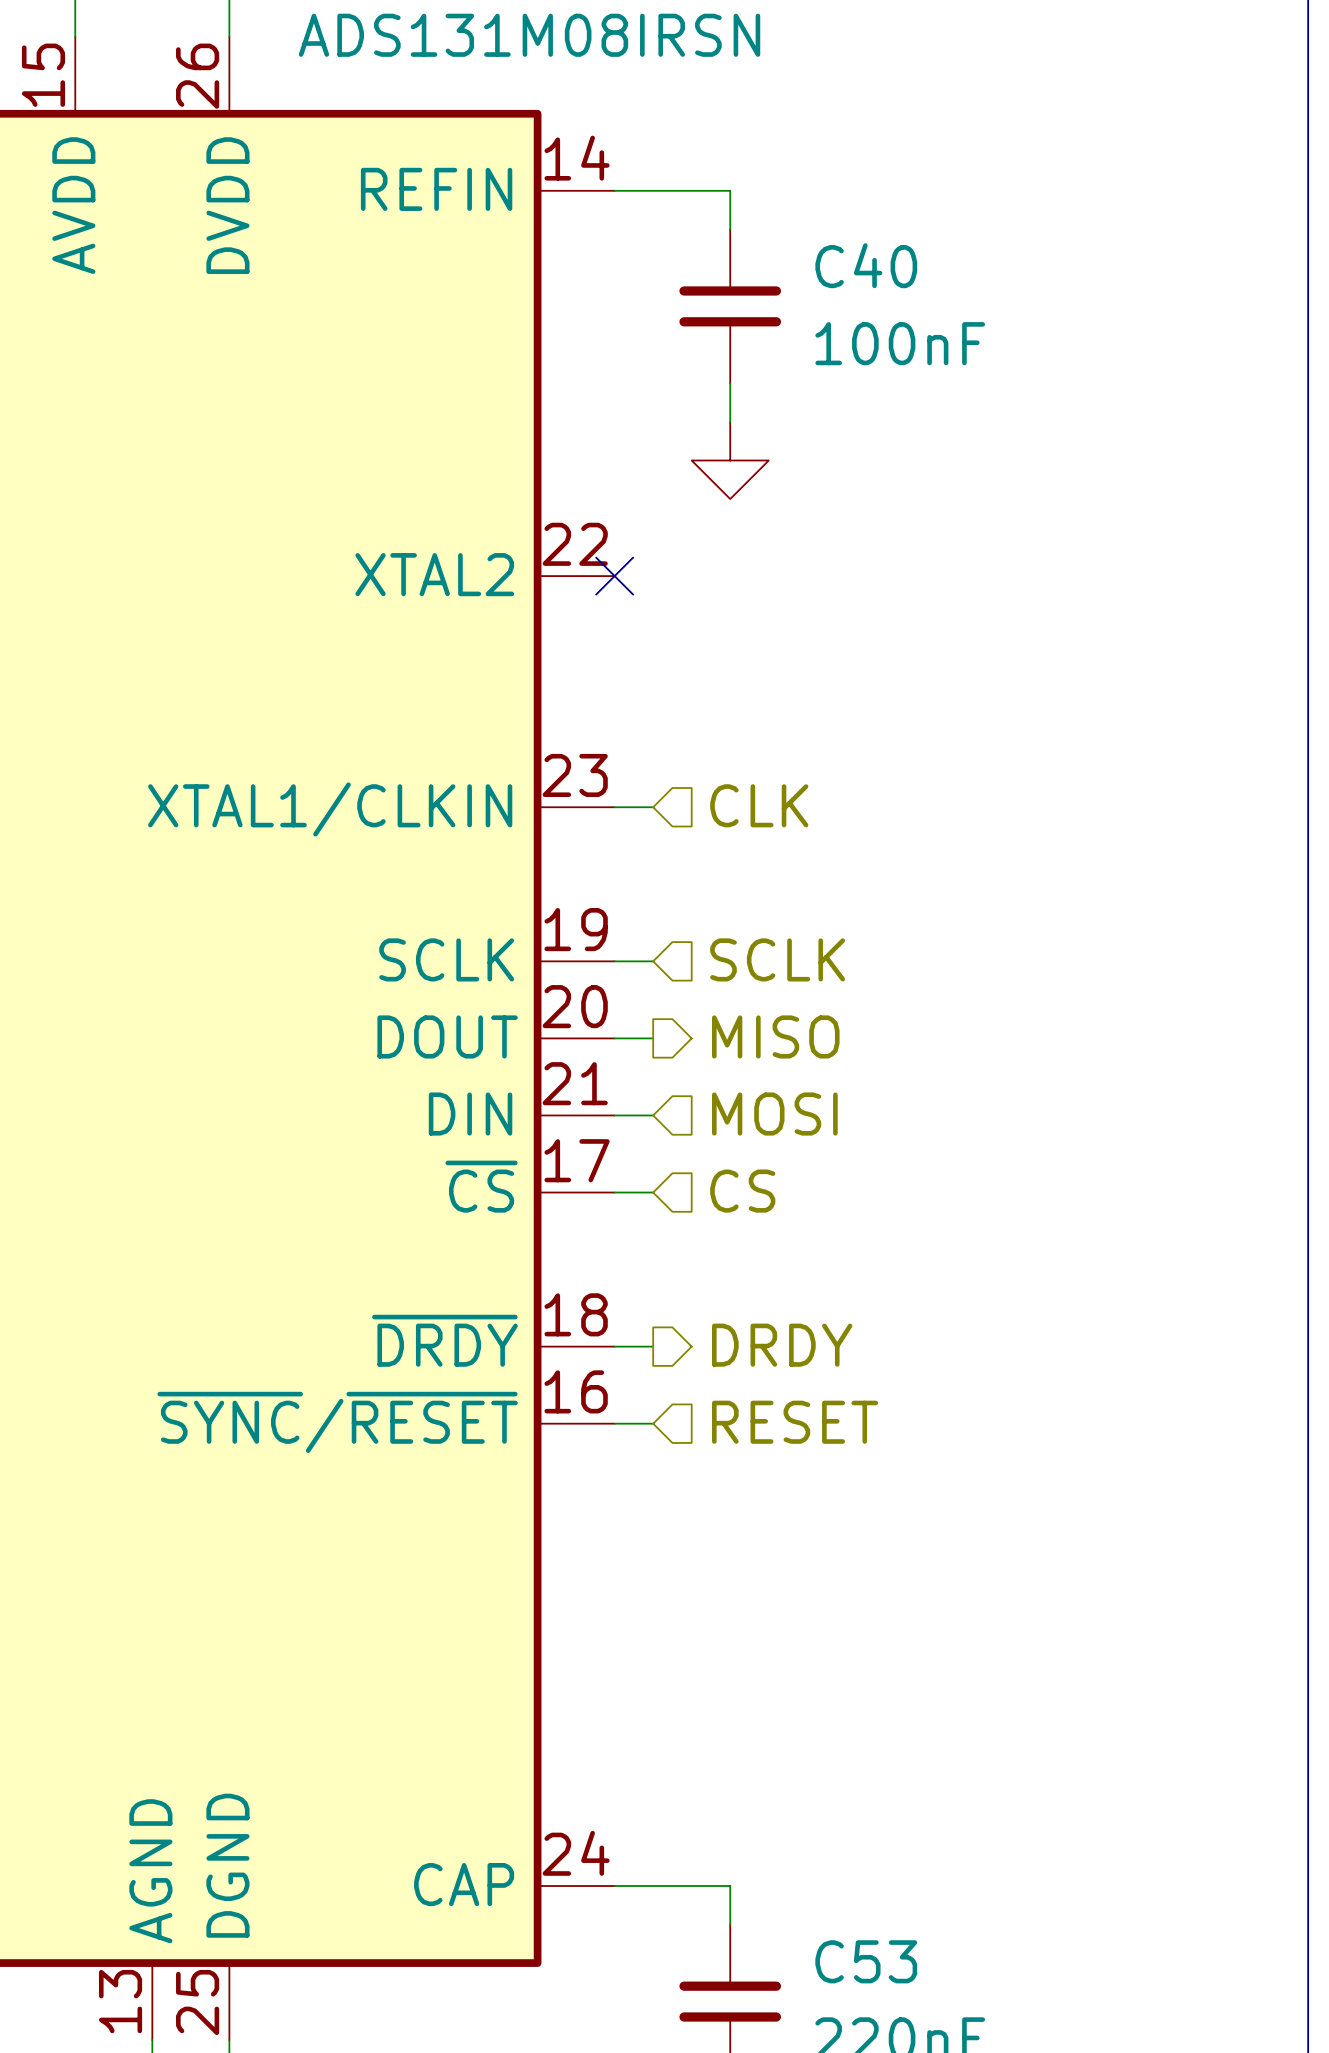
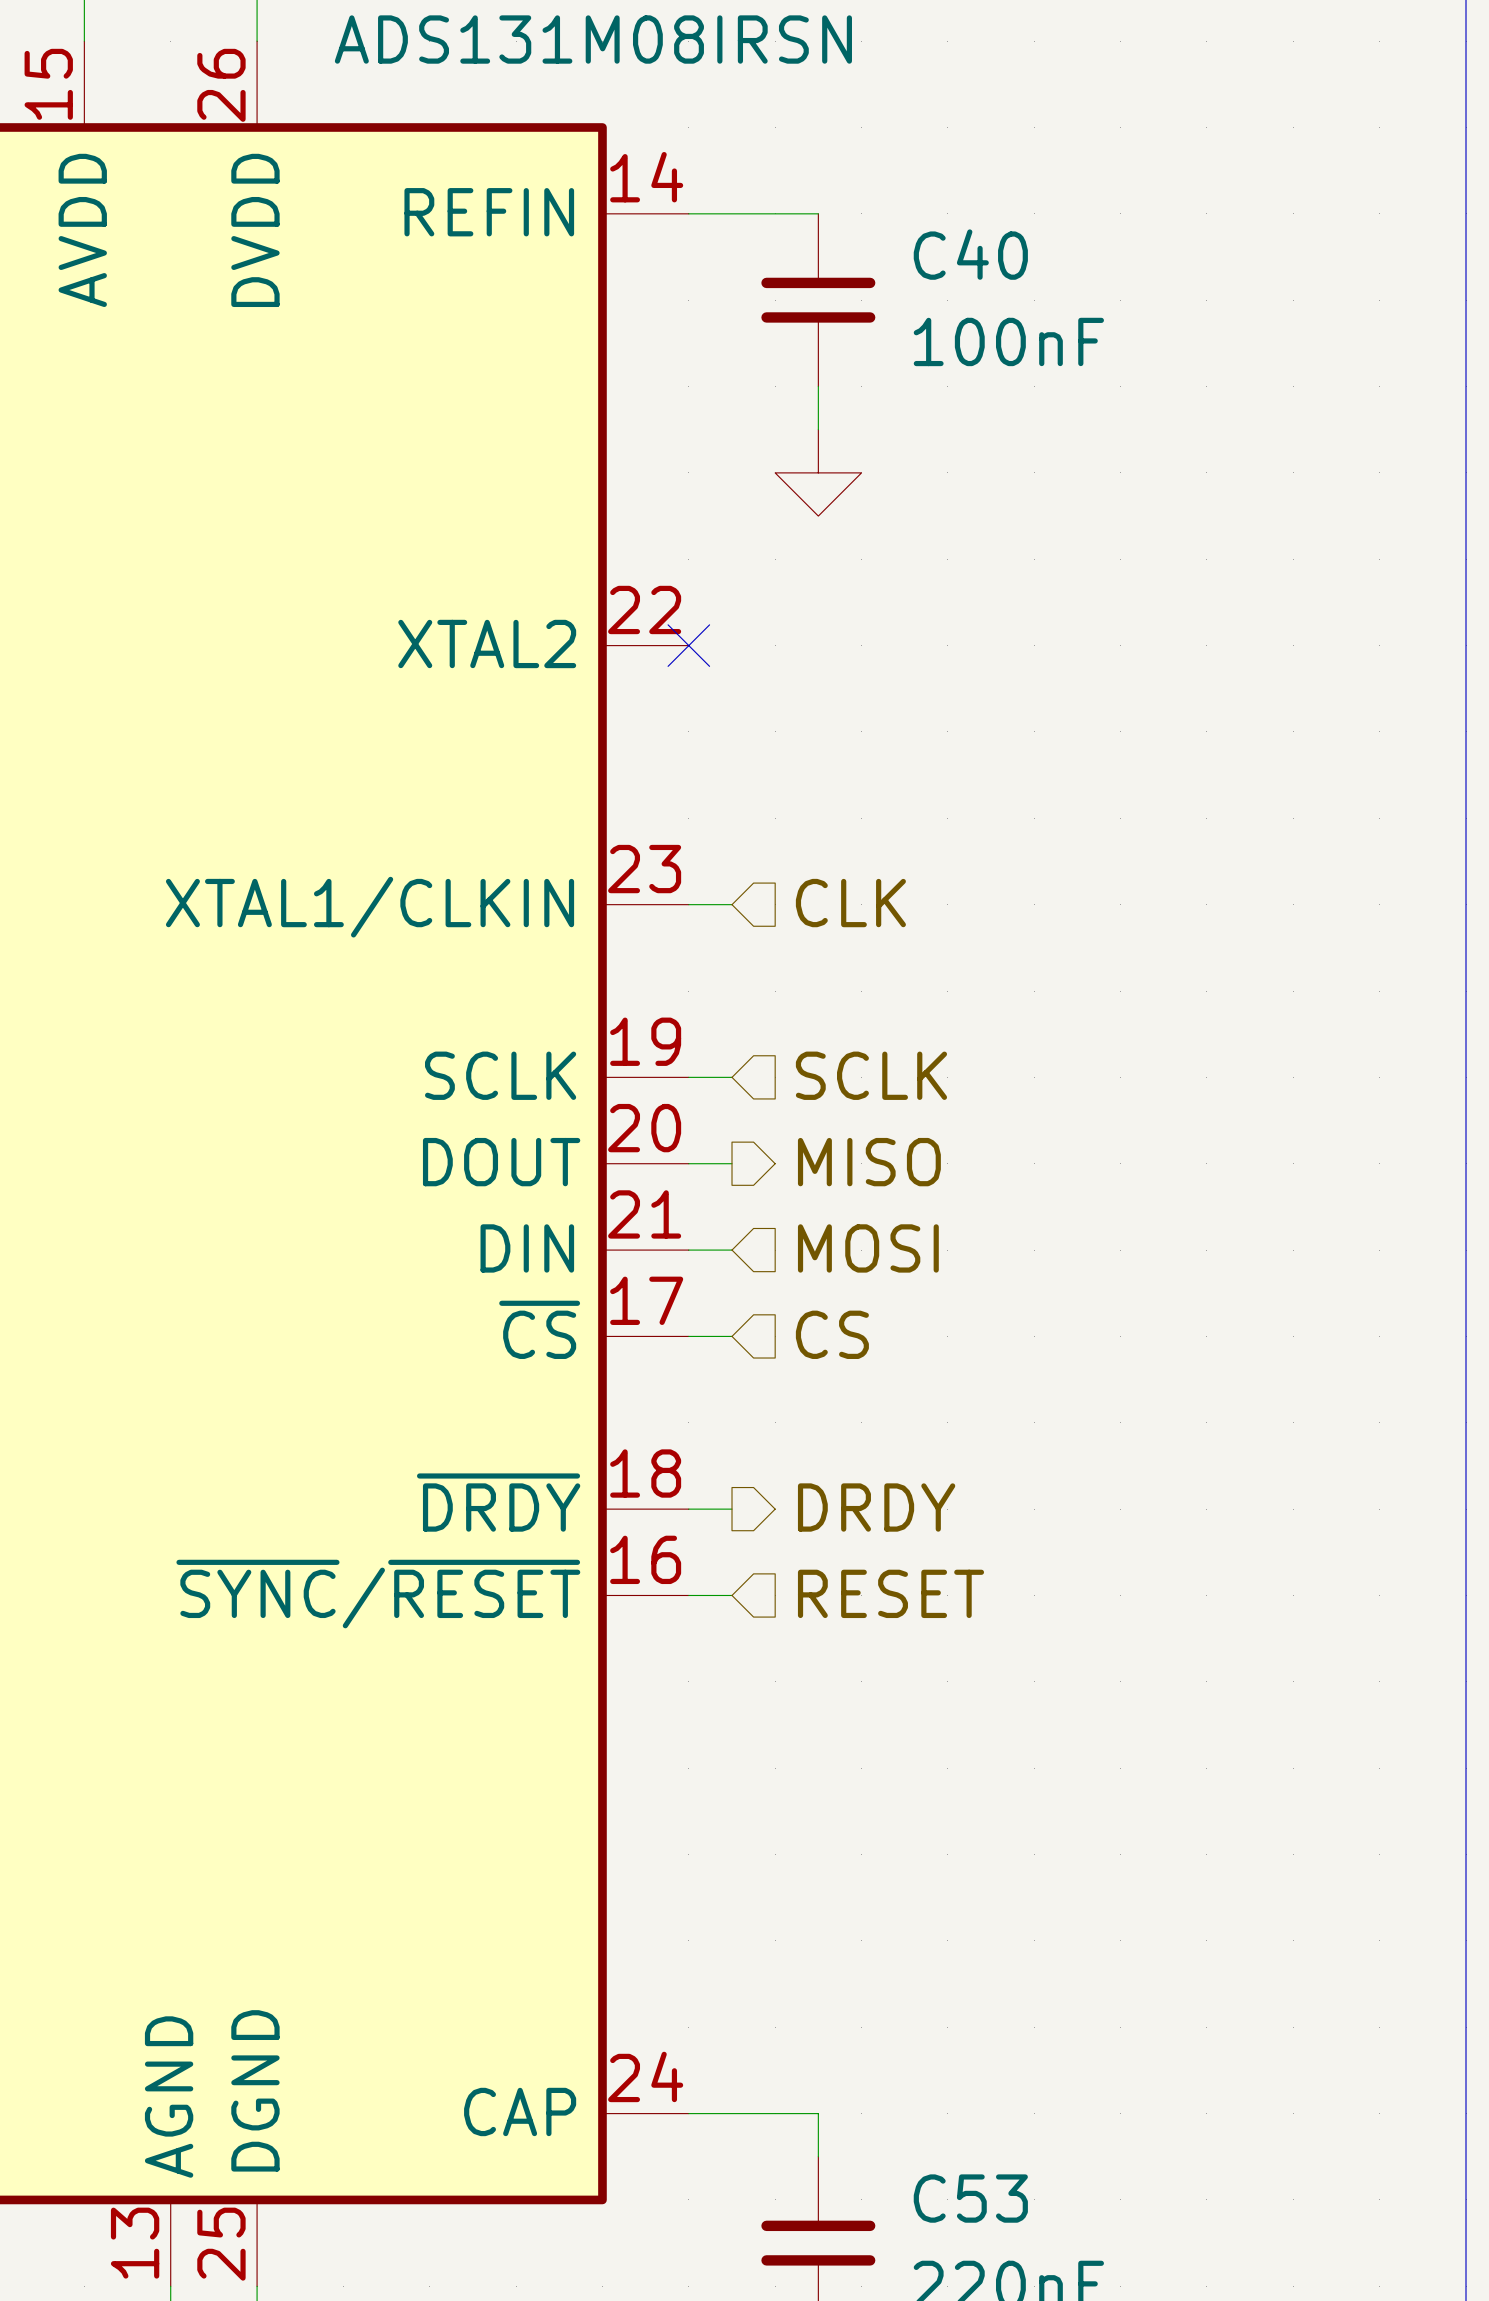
C40 position: (730, 306) -> (818, 300)
power symbol position: (730, 460) -> (818, 472)

